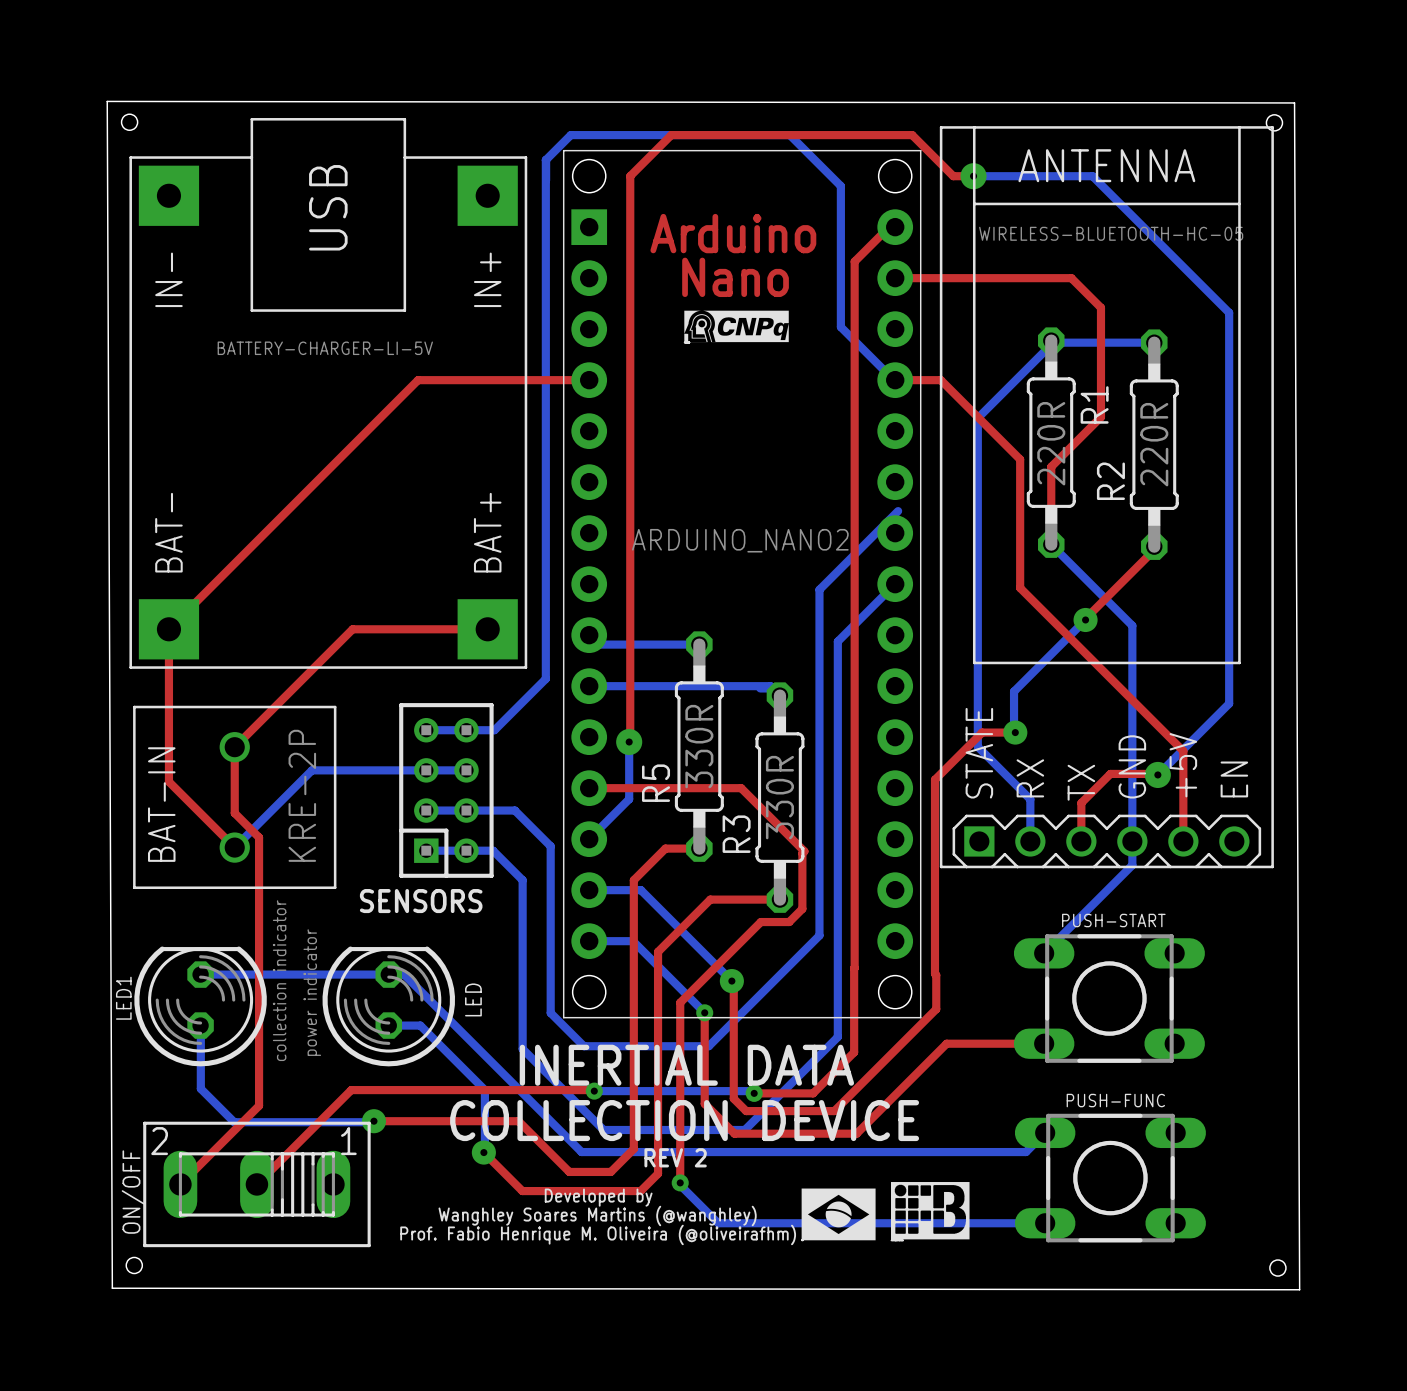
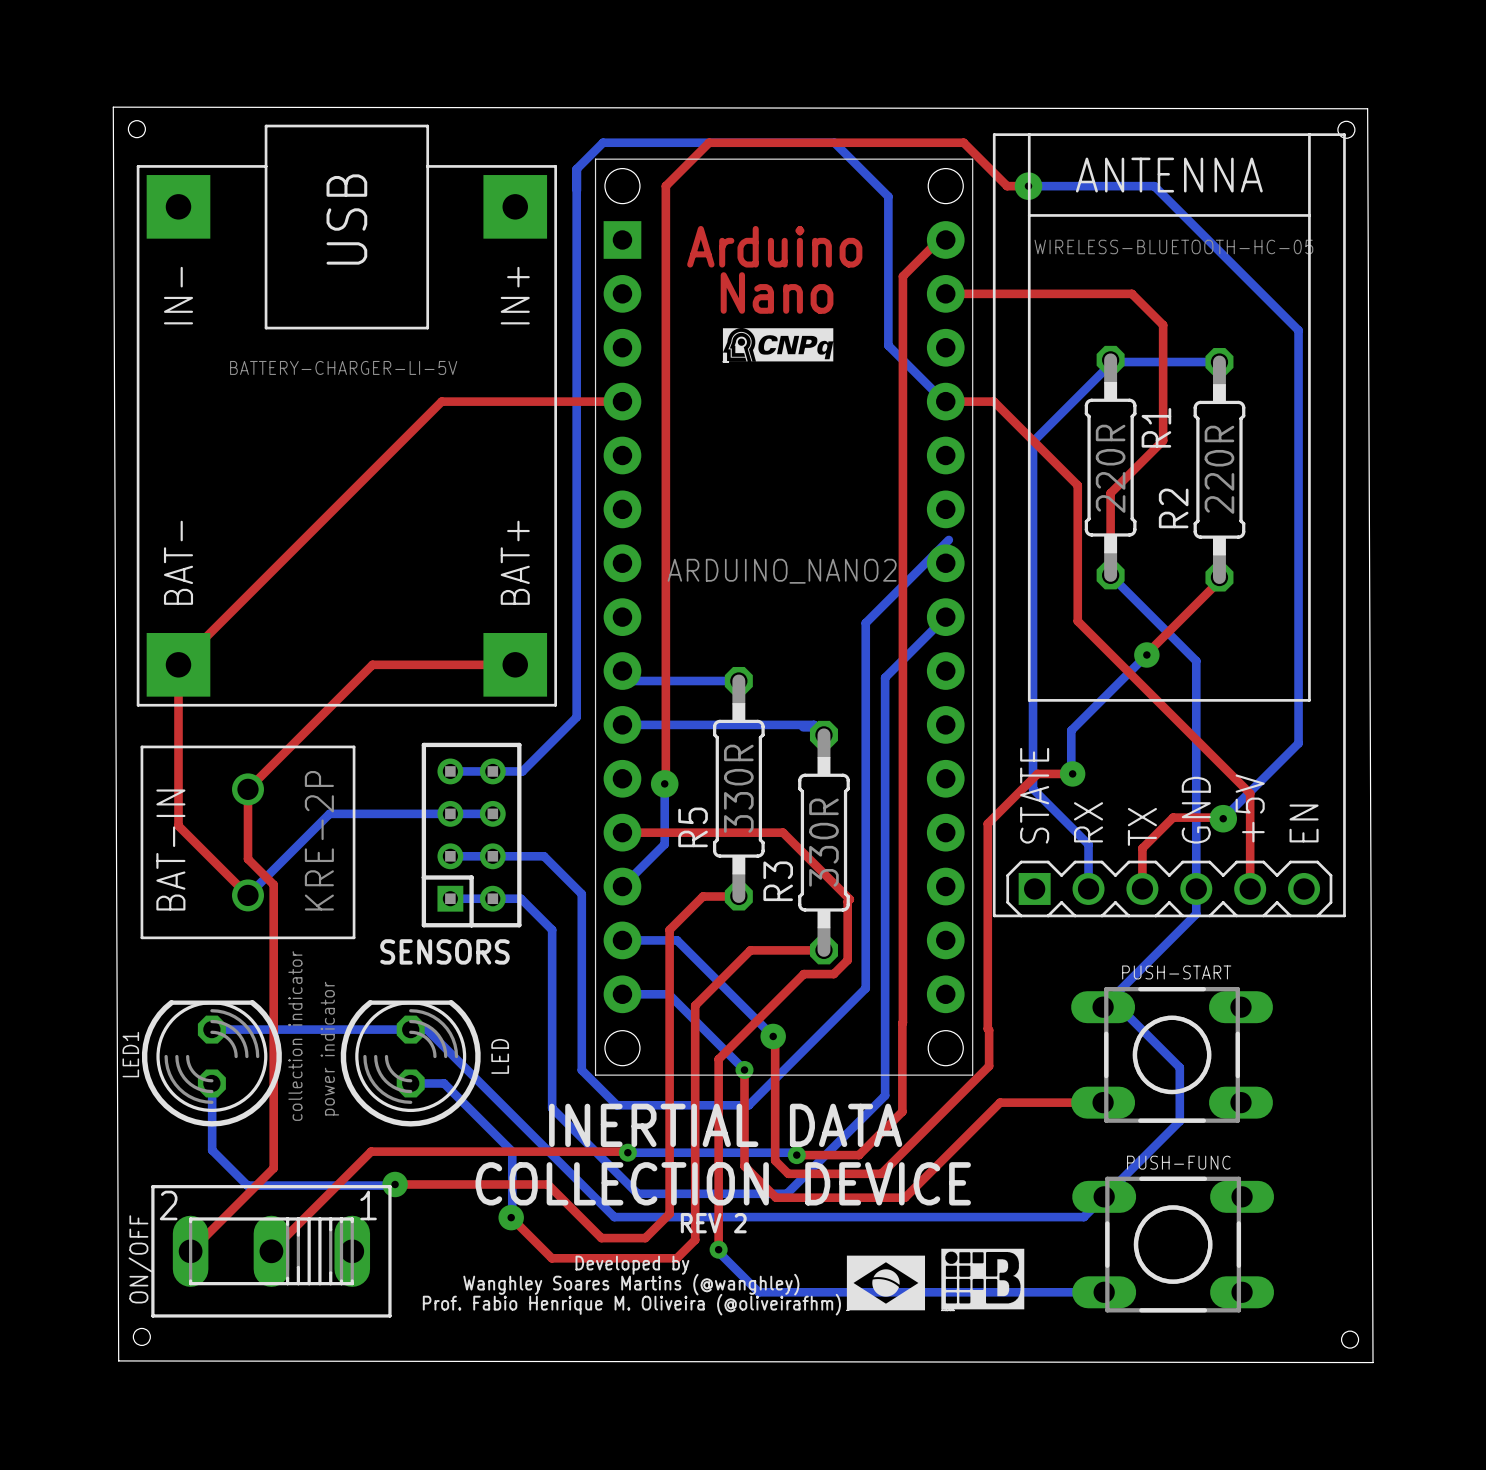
bottom track: none -> (1103, 1007) (1119, 1007) (1179, 1067) (1179, 1121) (1104, 1196)

